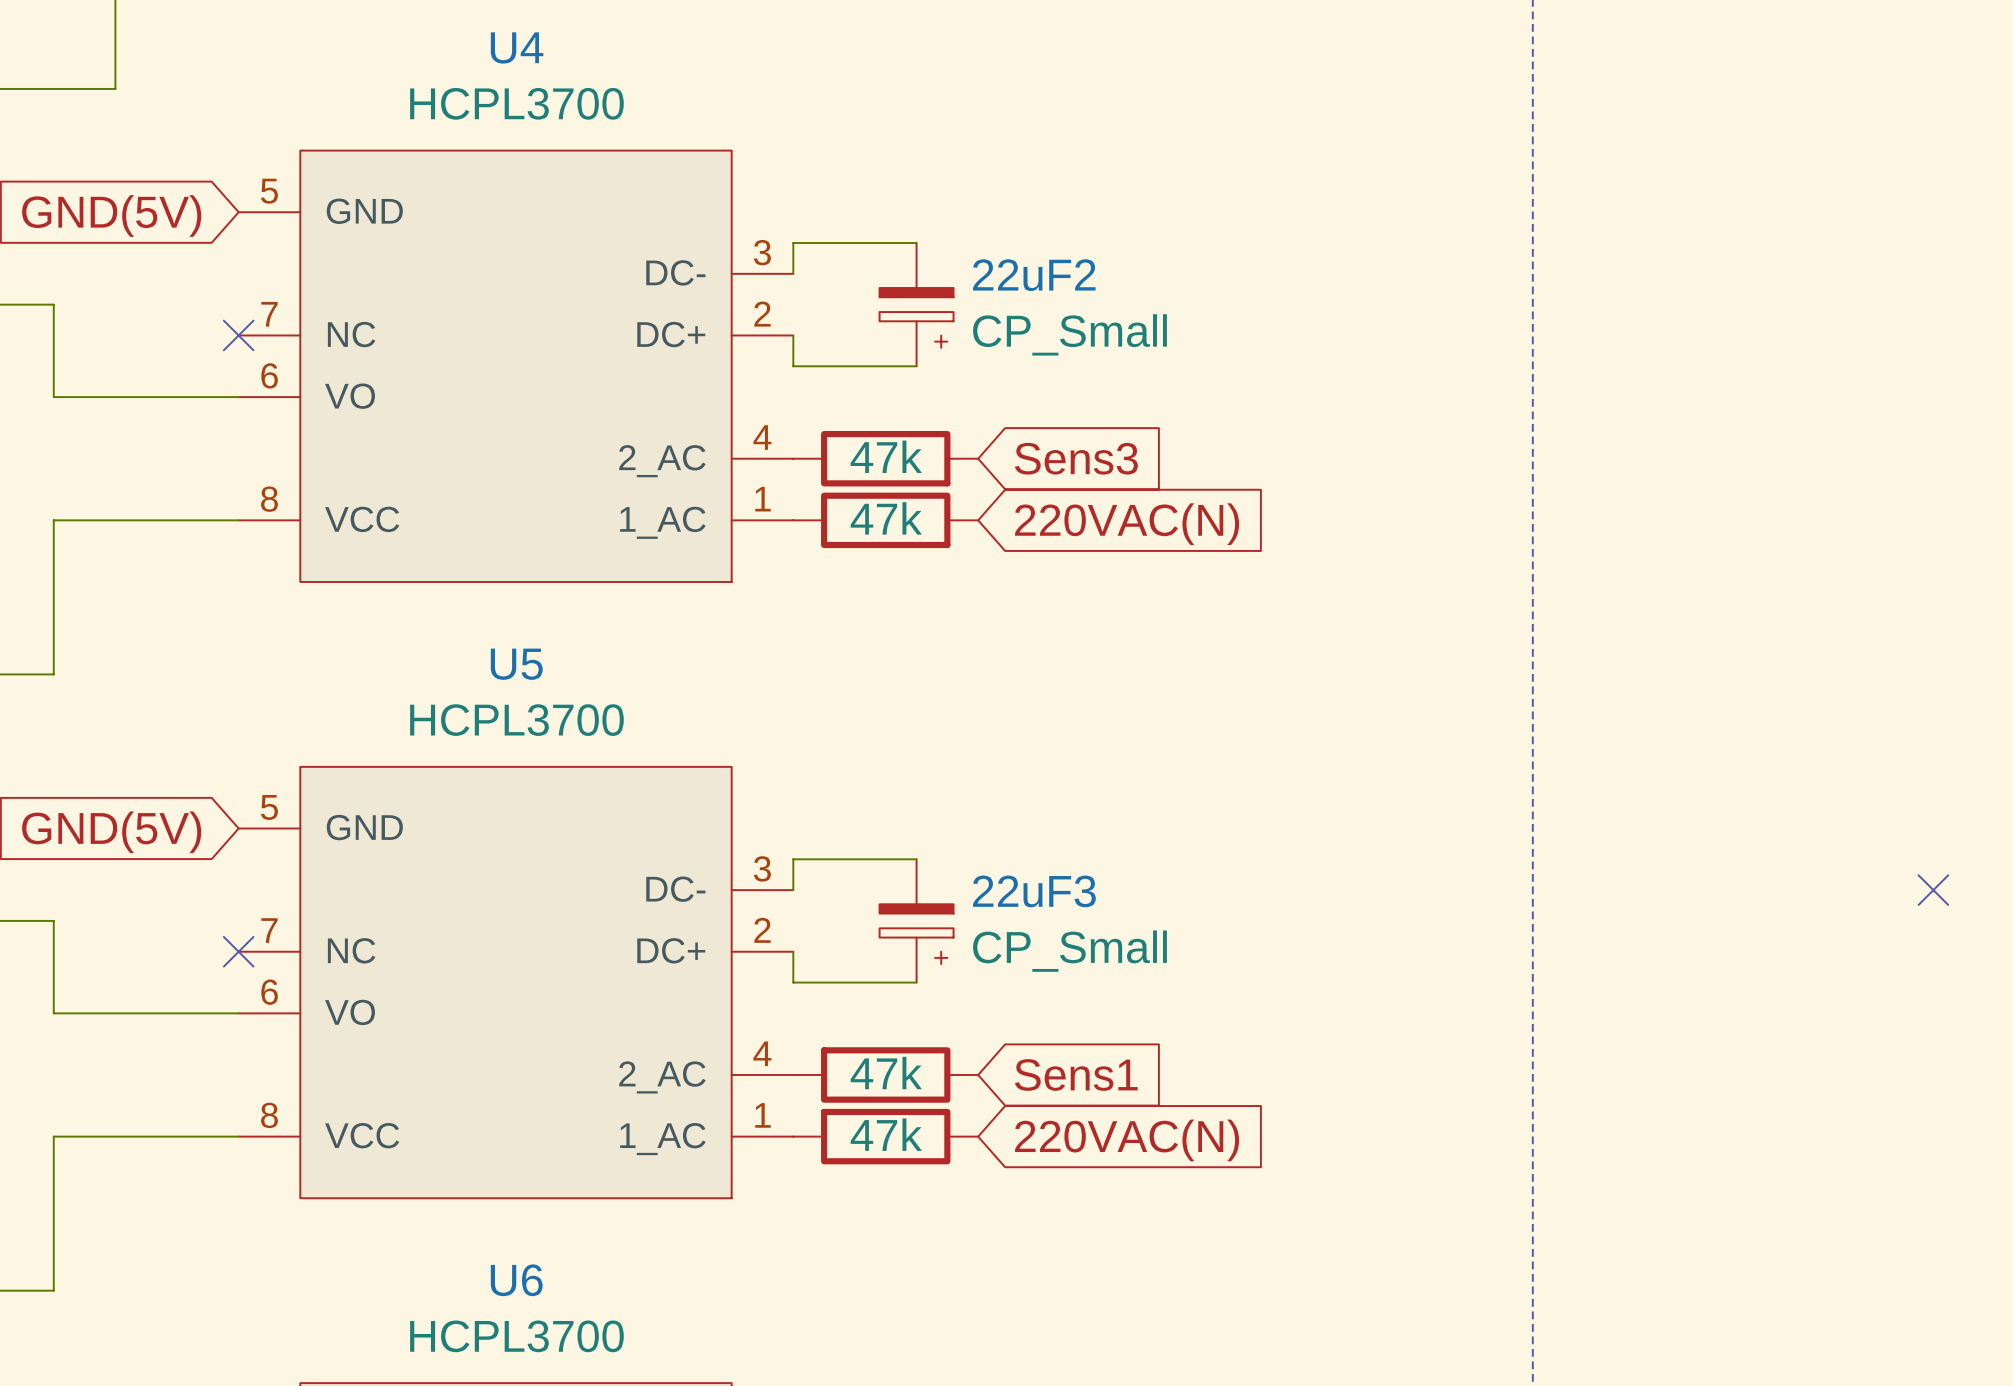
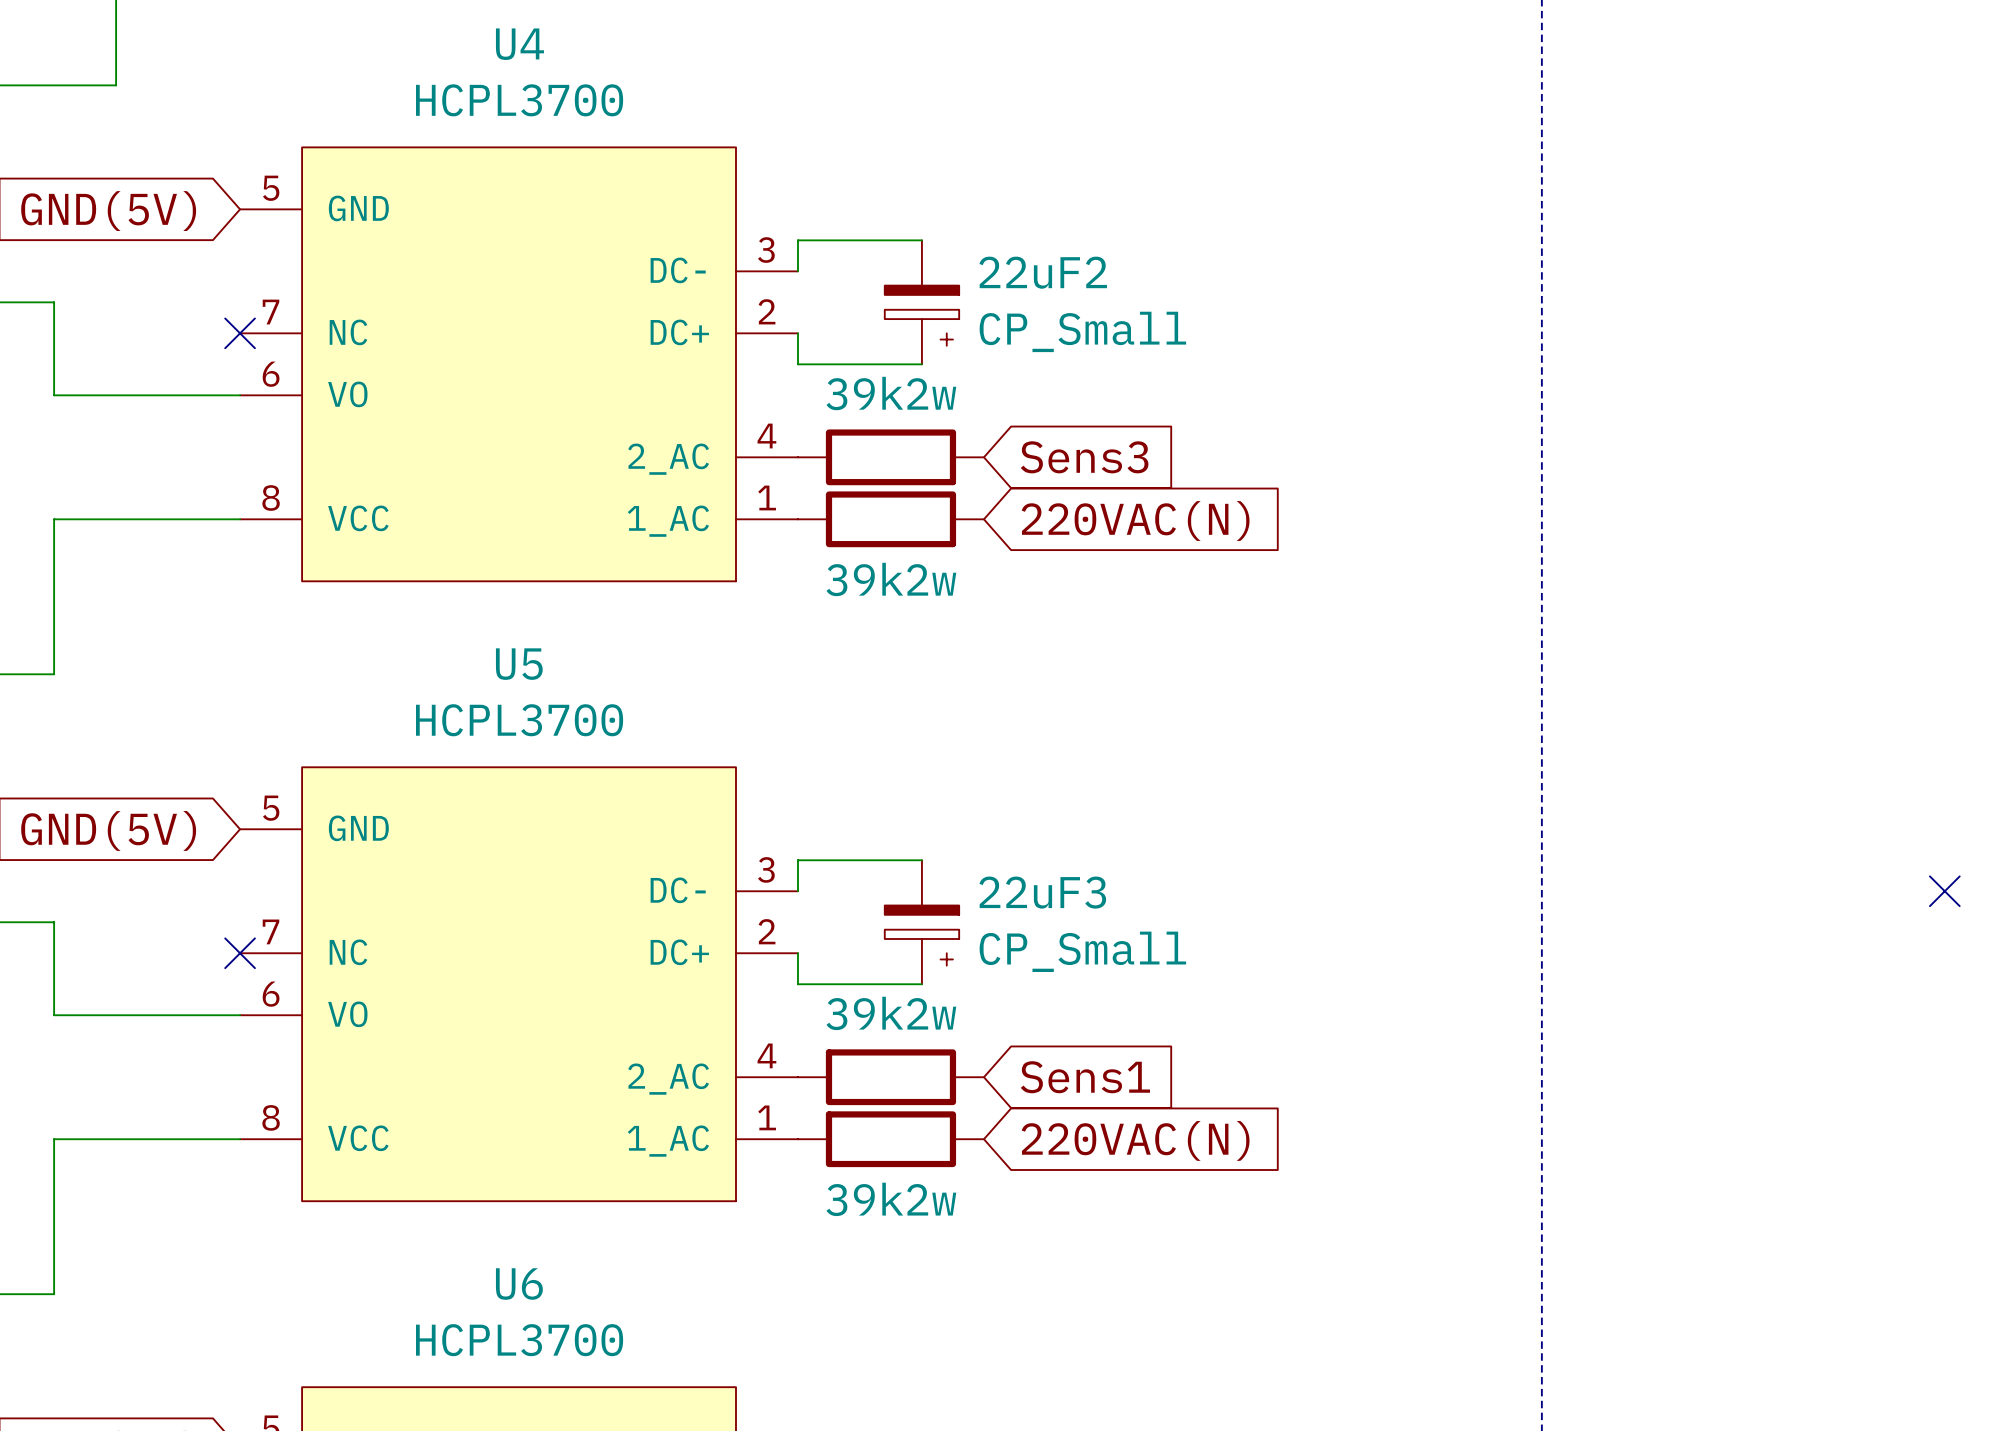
part value: 47k (886, 456) -> 39k2w (891, 393)
part value: 47k (886, 518) -> 39k2w (891, 579)
part value: 47k (886, 1073) -> 39k2w (891, 1013)
part value: 47k (886, 1134) -> 39k2w (891, 1199)

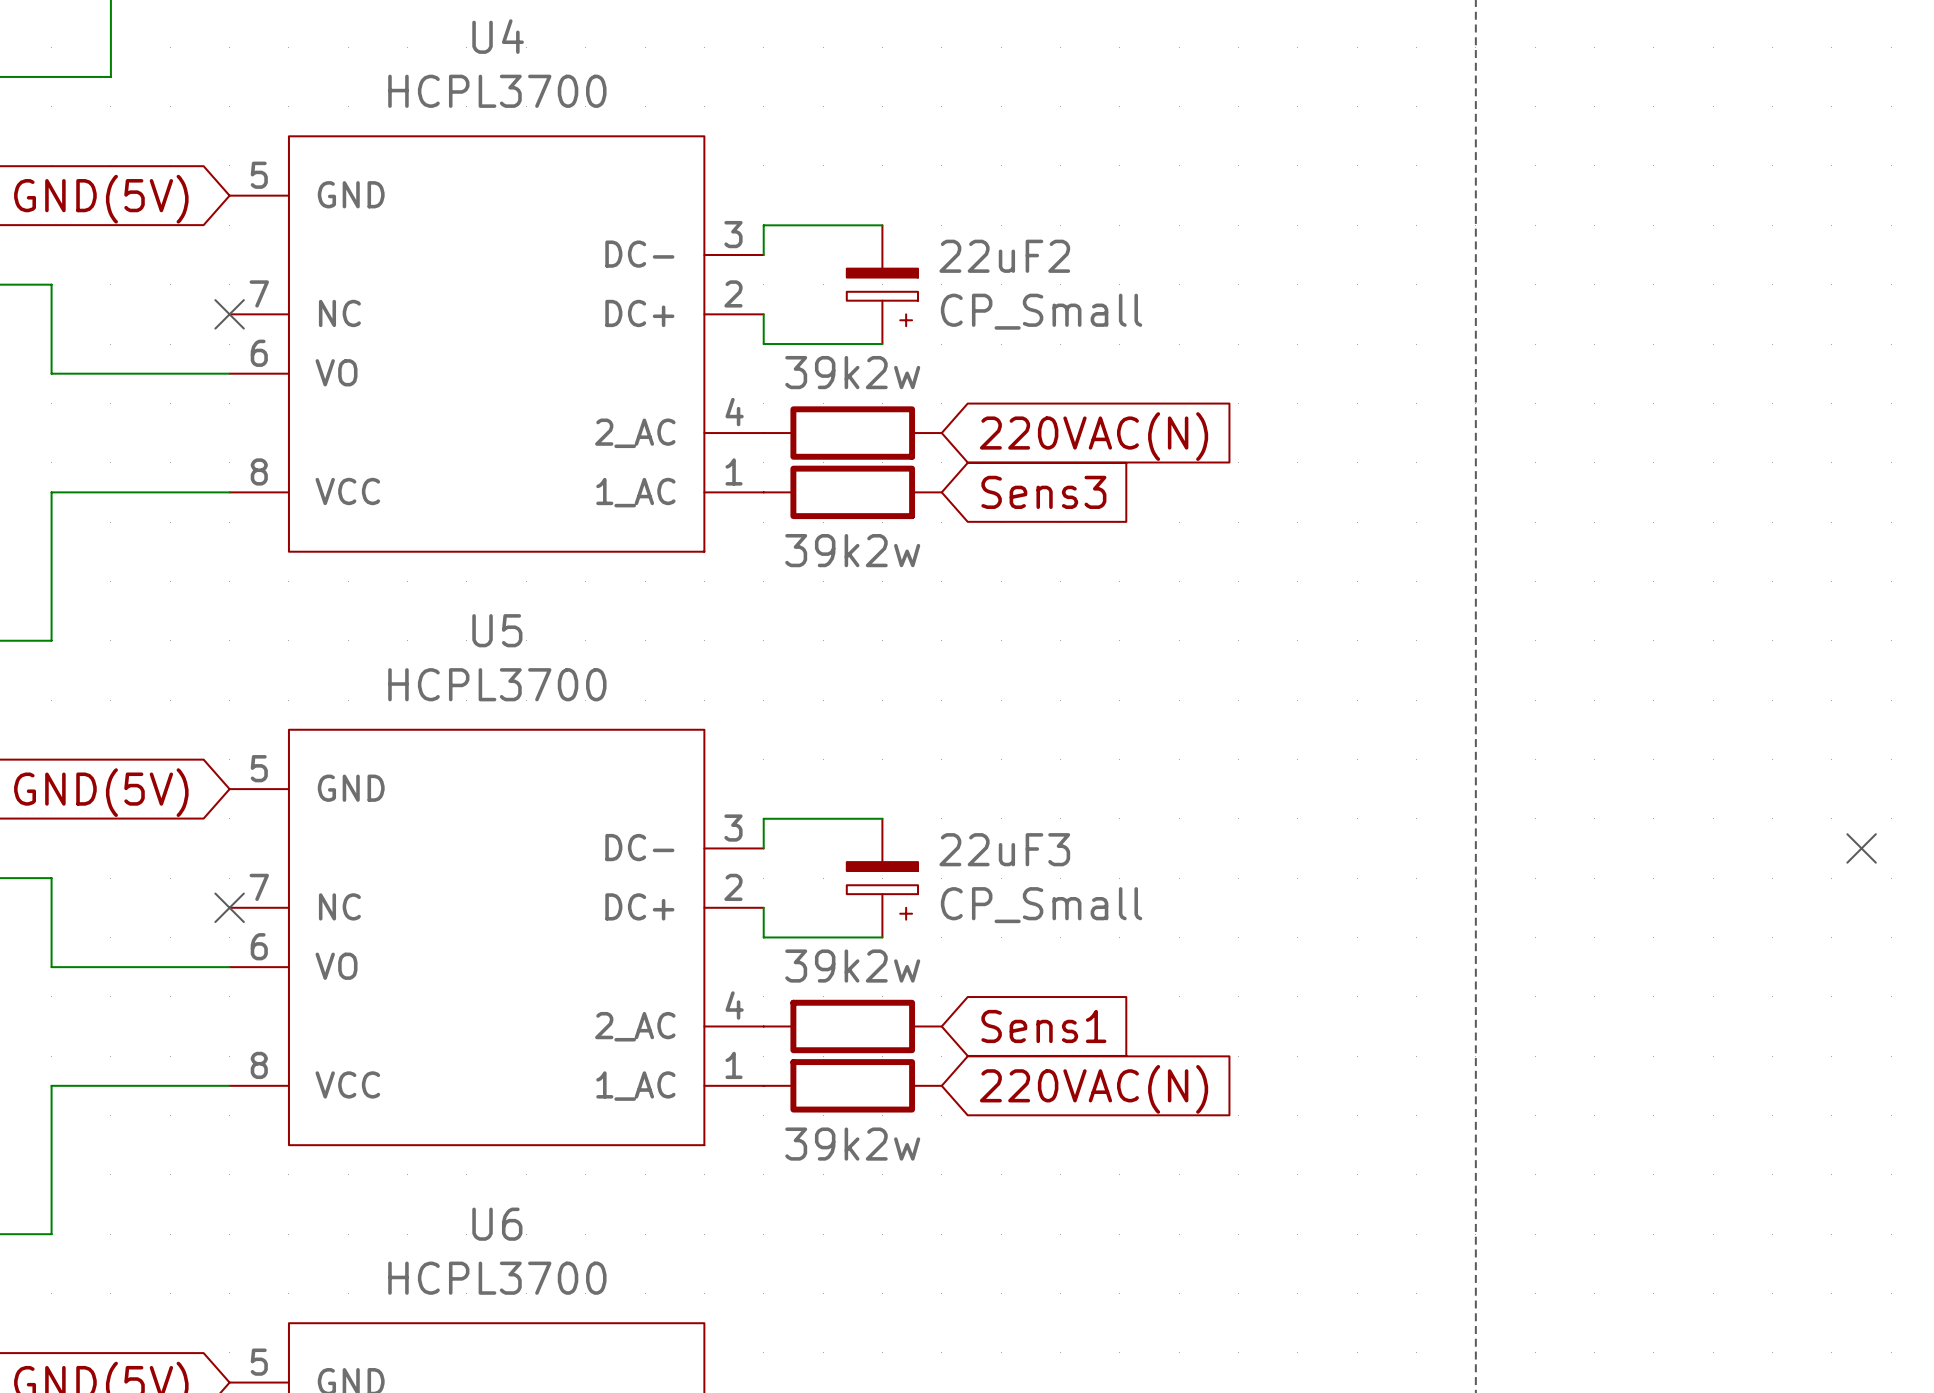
global label: Sens3 (1084, 457) -> 220VAC(N) (1094, 436)
global label: 220VAC(N) (1135, 521) -> Sens3 (1043, 492)

